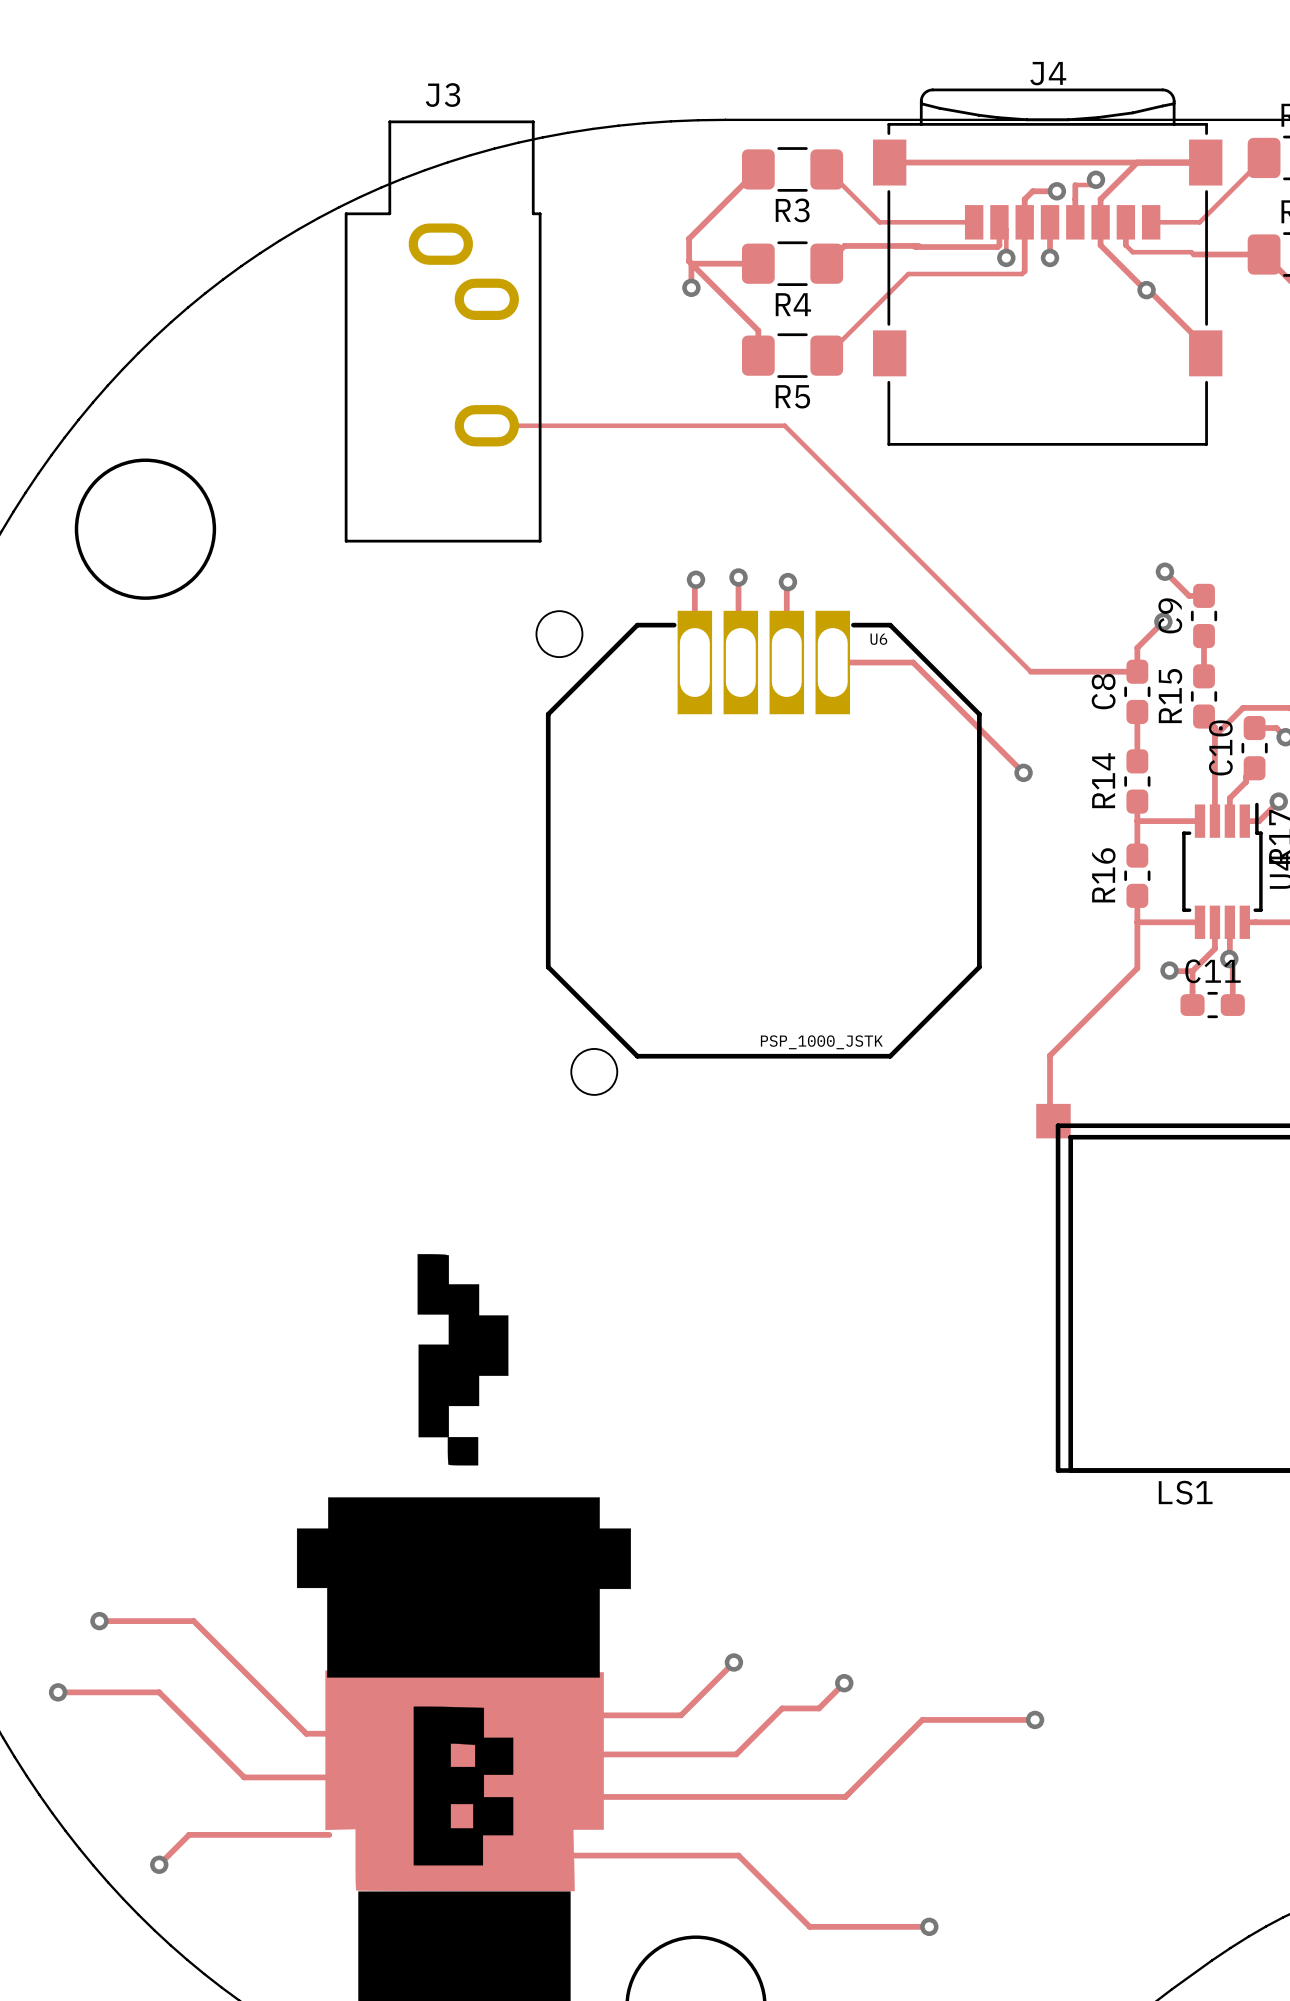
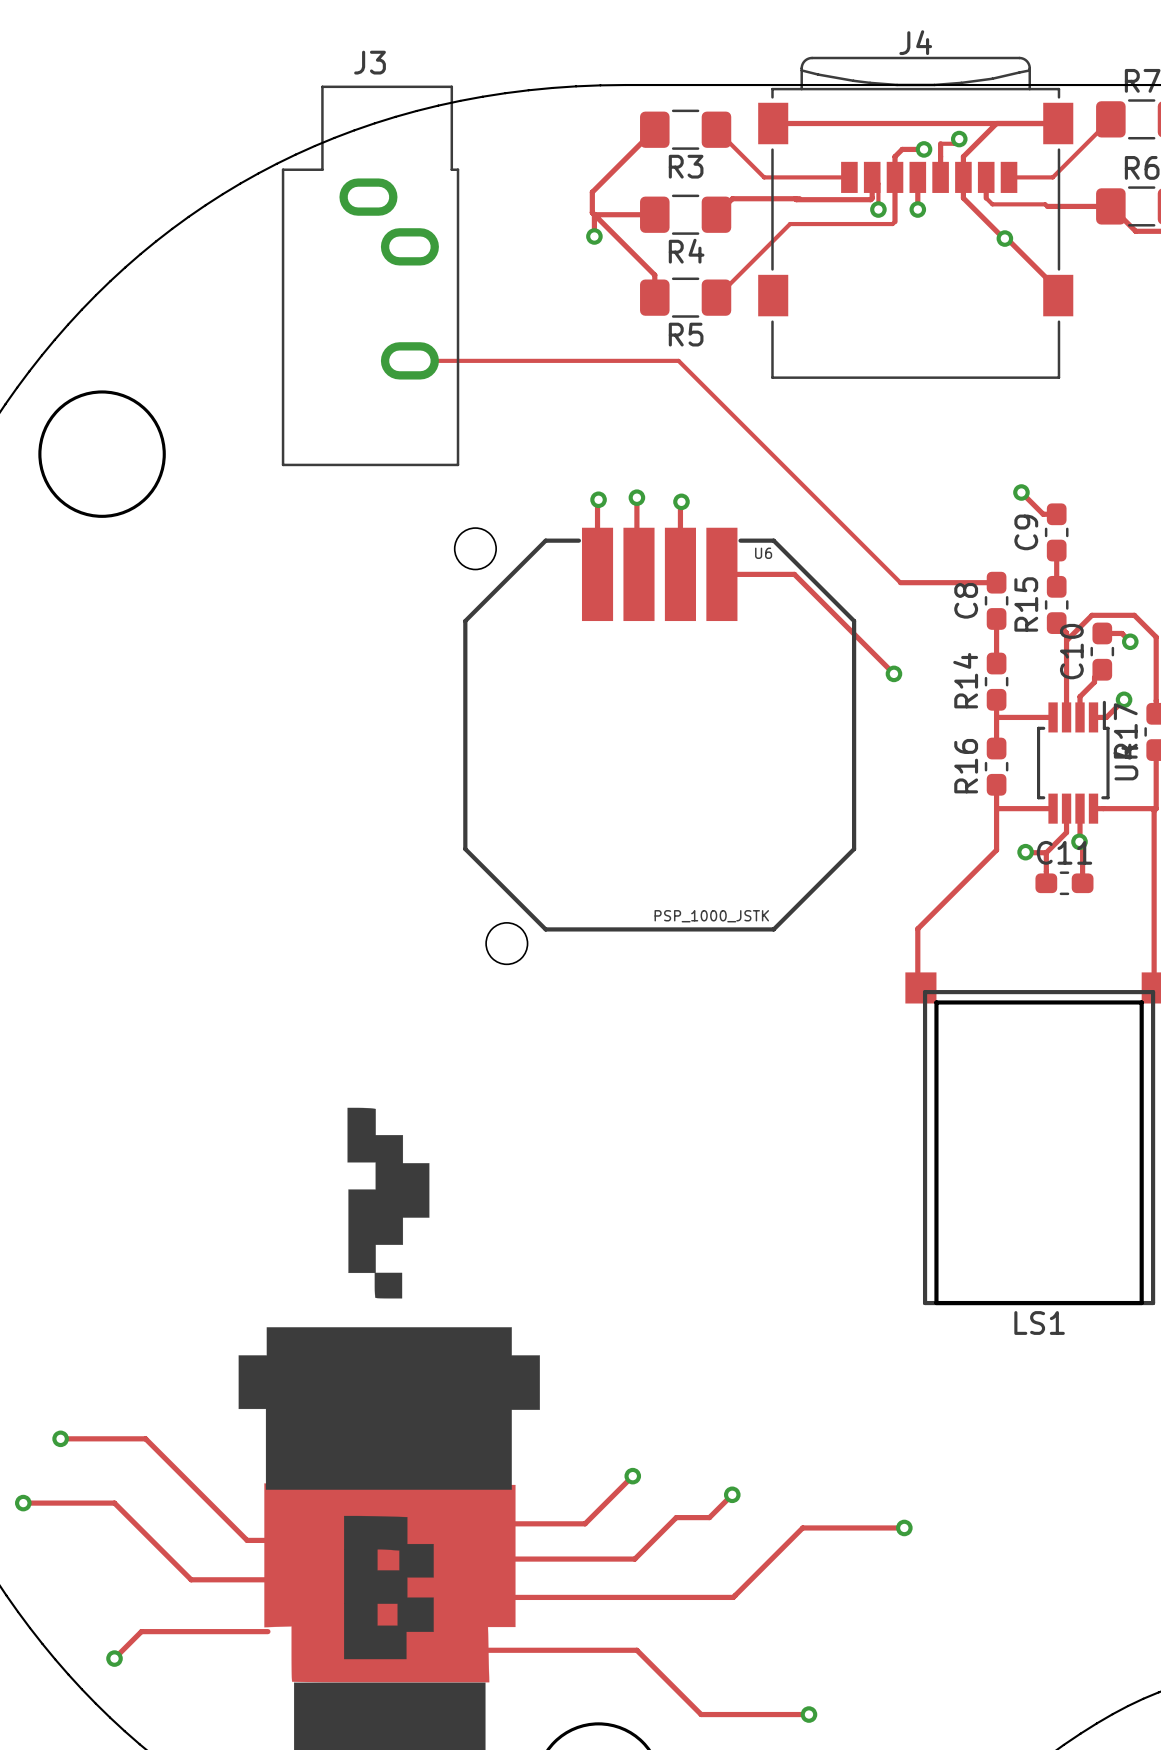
U6 footprint: [536, 610, 982, 1095] -> [454, 527, 857, 965]
track: (1163, 621) (1137, 647) (1137, 671) -> none
via: (1163, 621) -> none

